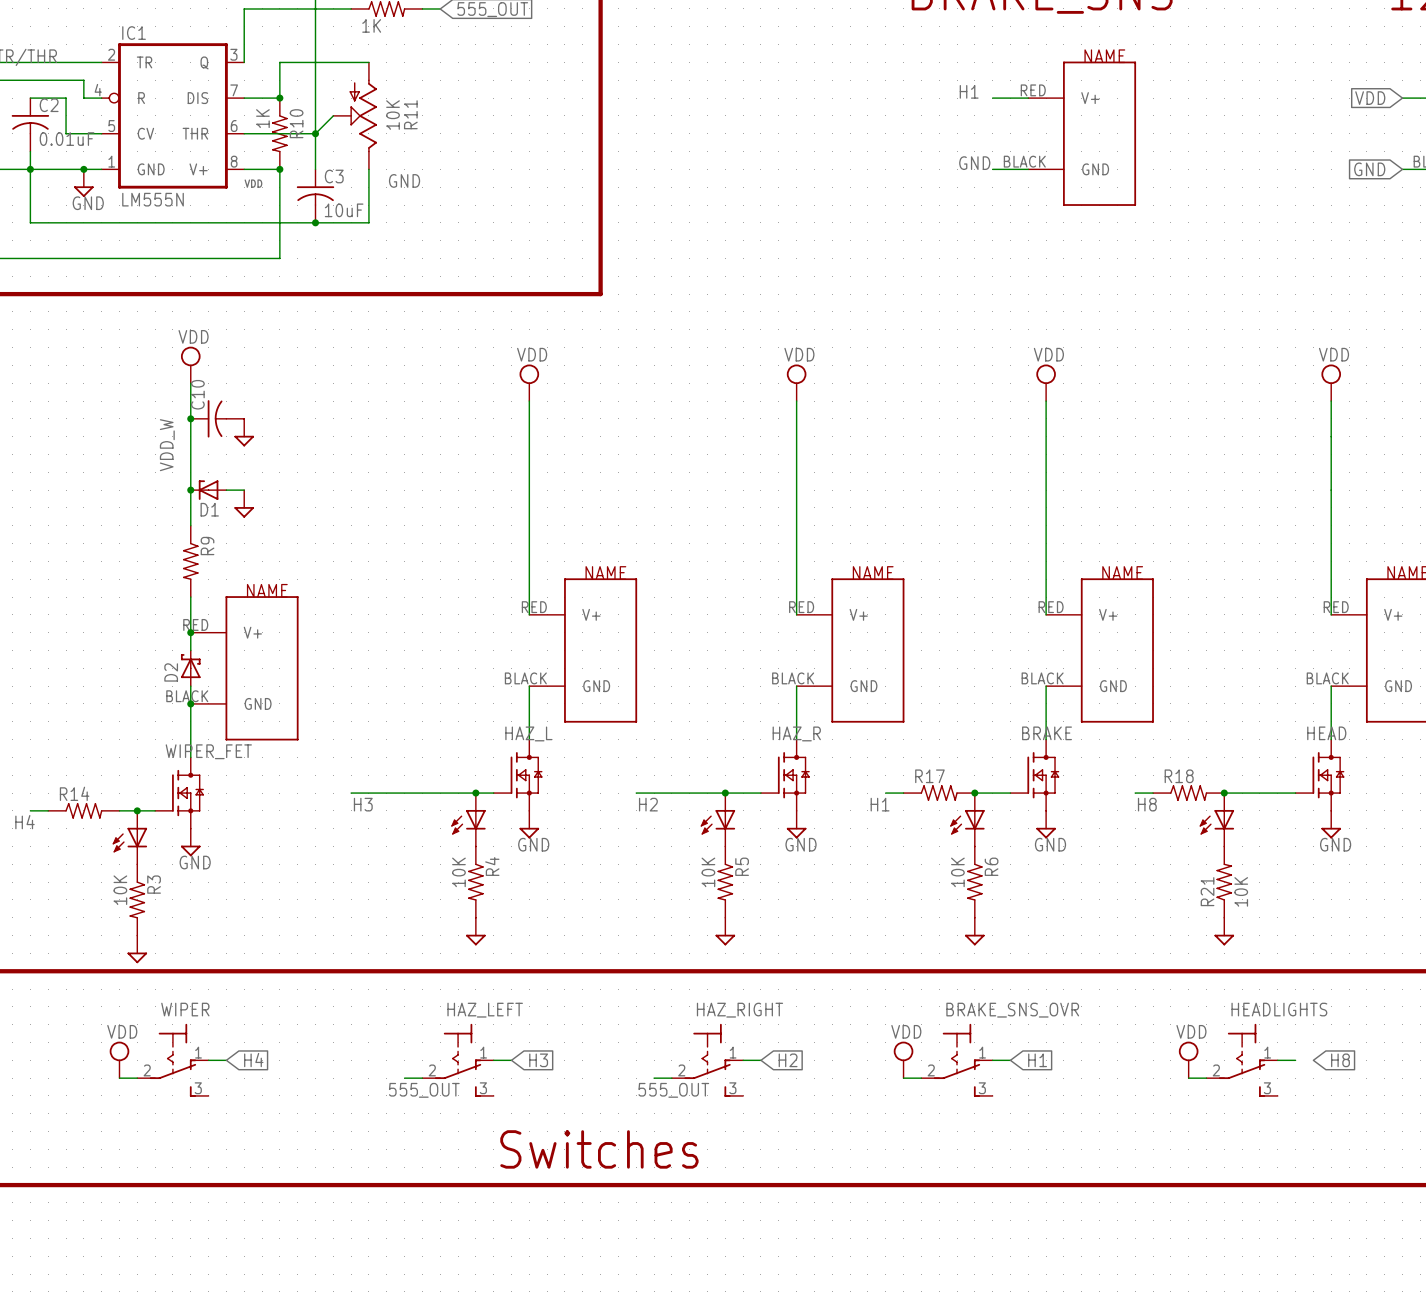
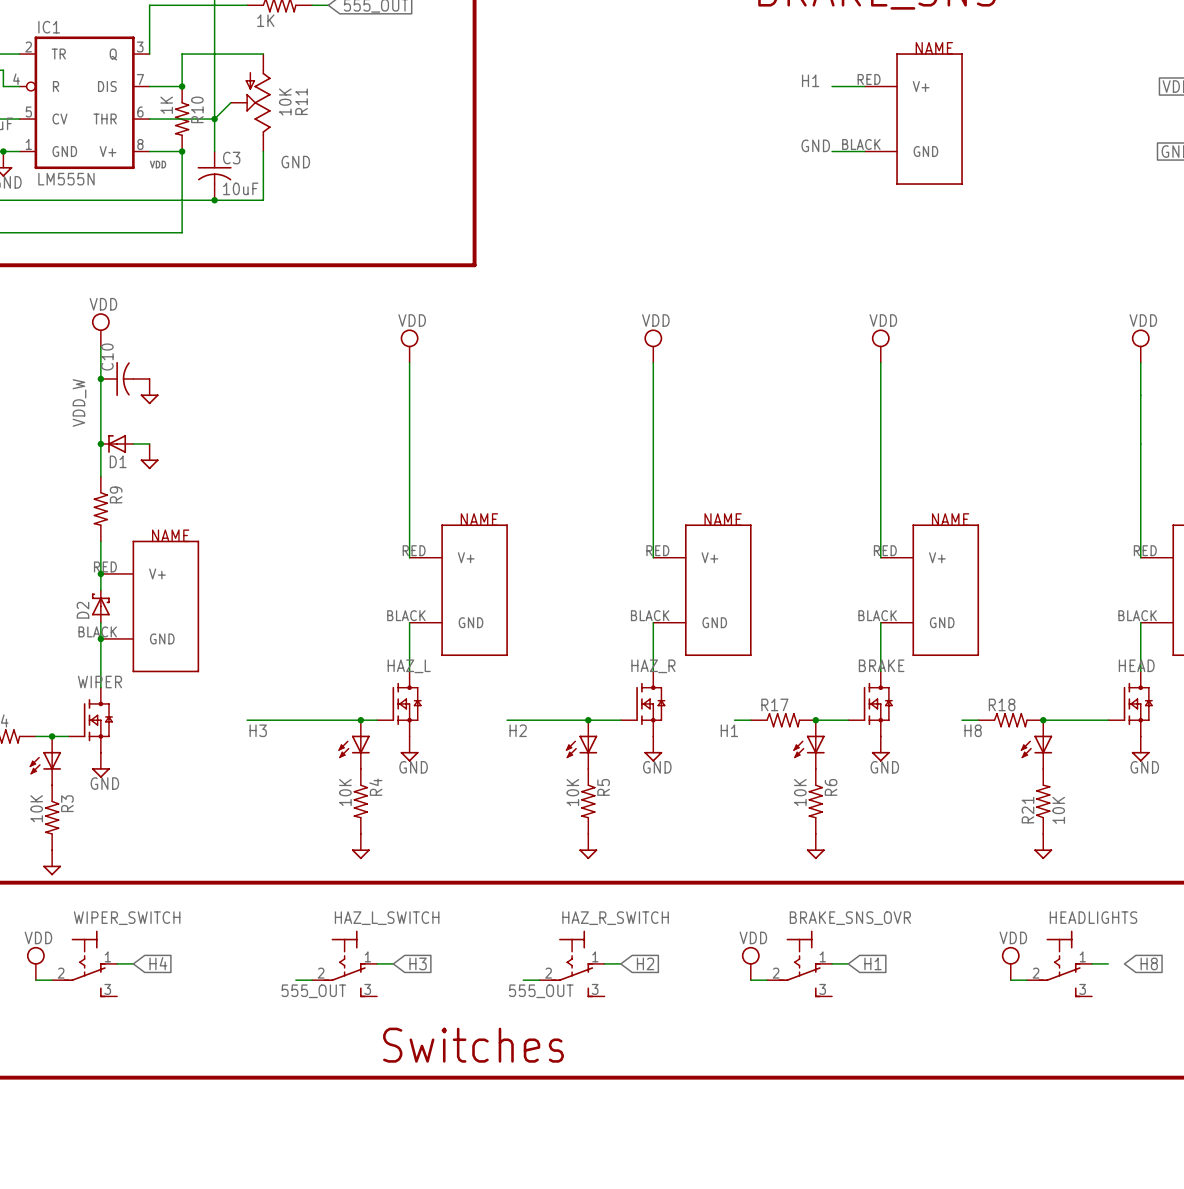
WIPER_FET name: WIPER_FET (208, 751) -> WIPER (100, 682)
WIPER name: WIPER (185, 1009) -> WIPER_SWITCH (127, 918)
HAZ_LEFT name: HAZ_LEFT (485, 1010) -> HAZ_L_SWITCH (387, 918)
HAZ_RIGHT name: HAZ_RIGHT (739, 1010) -> HAZ_R_SWITCH (615, 918)

